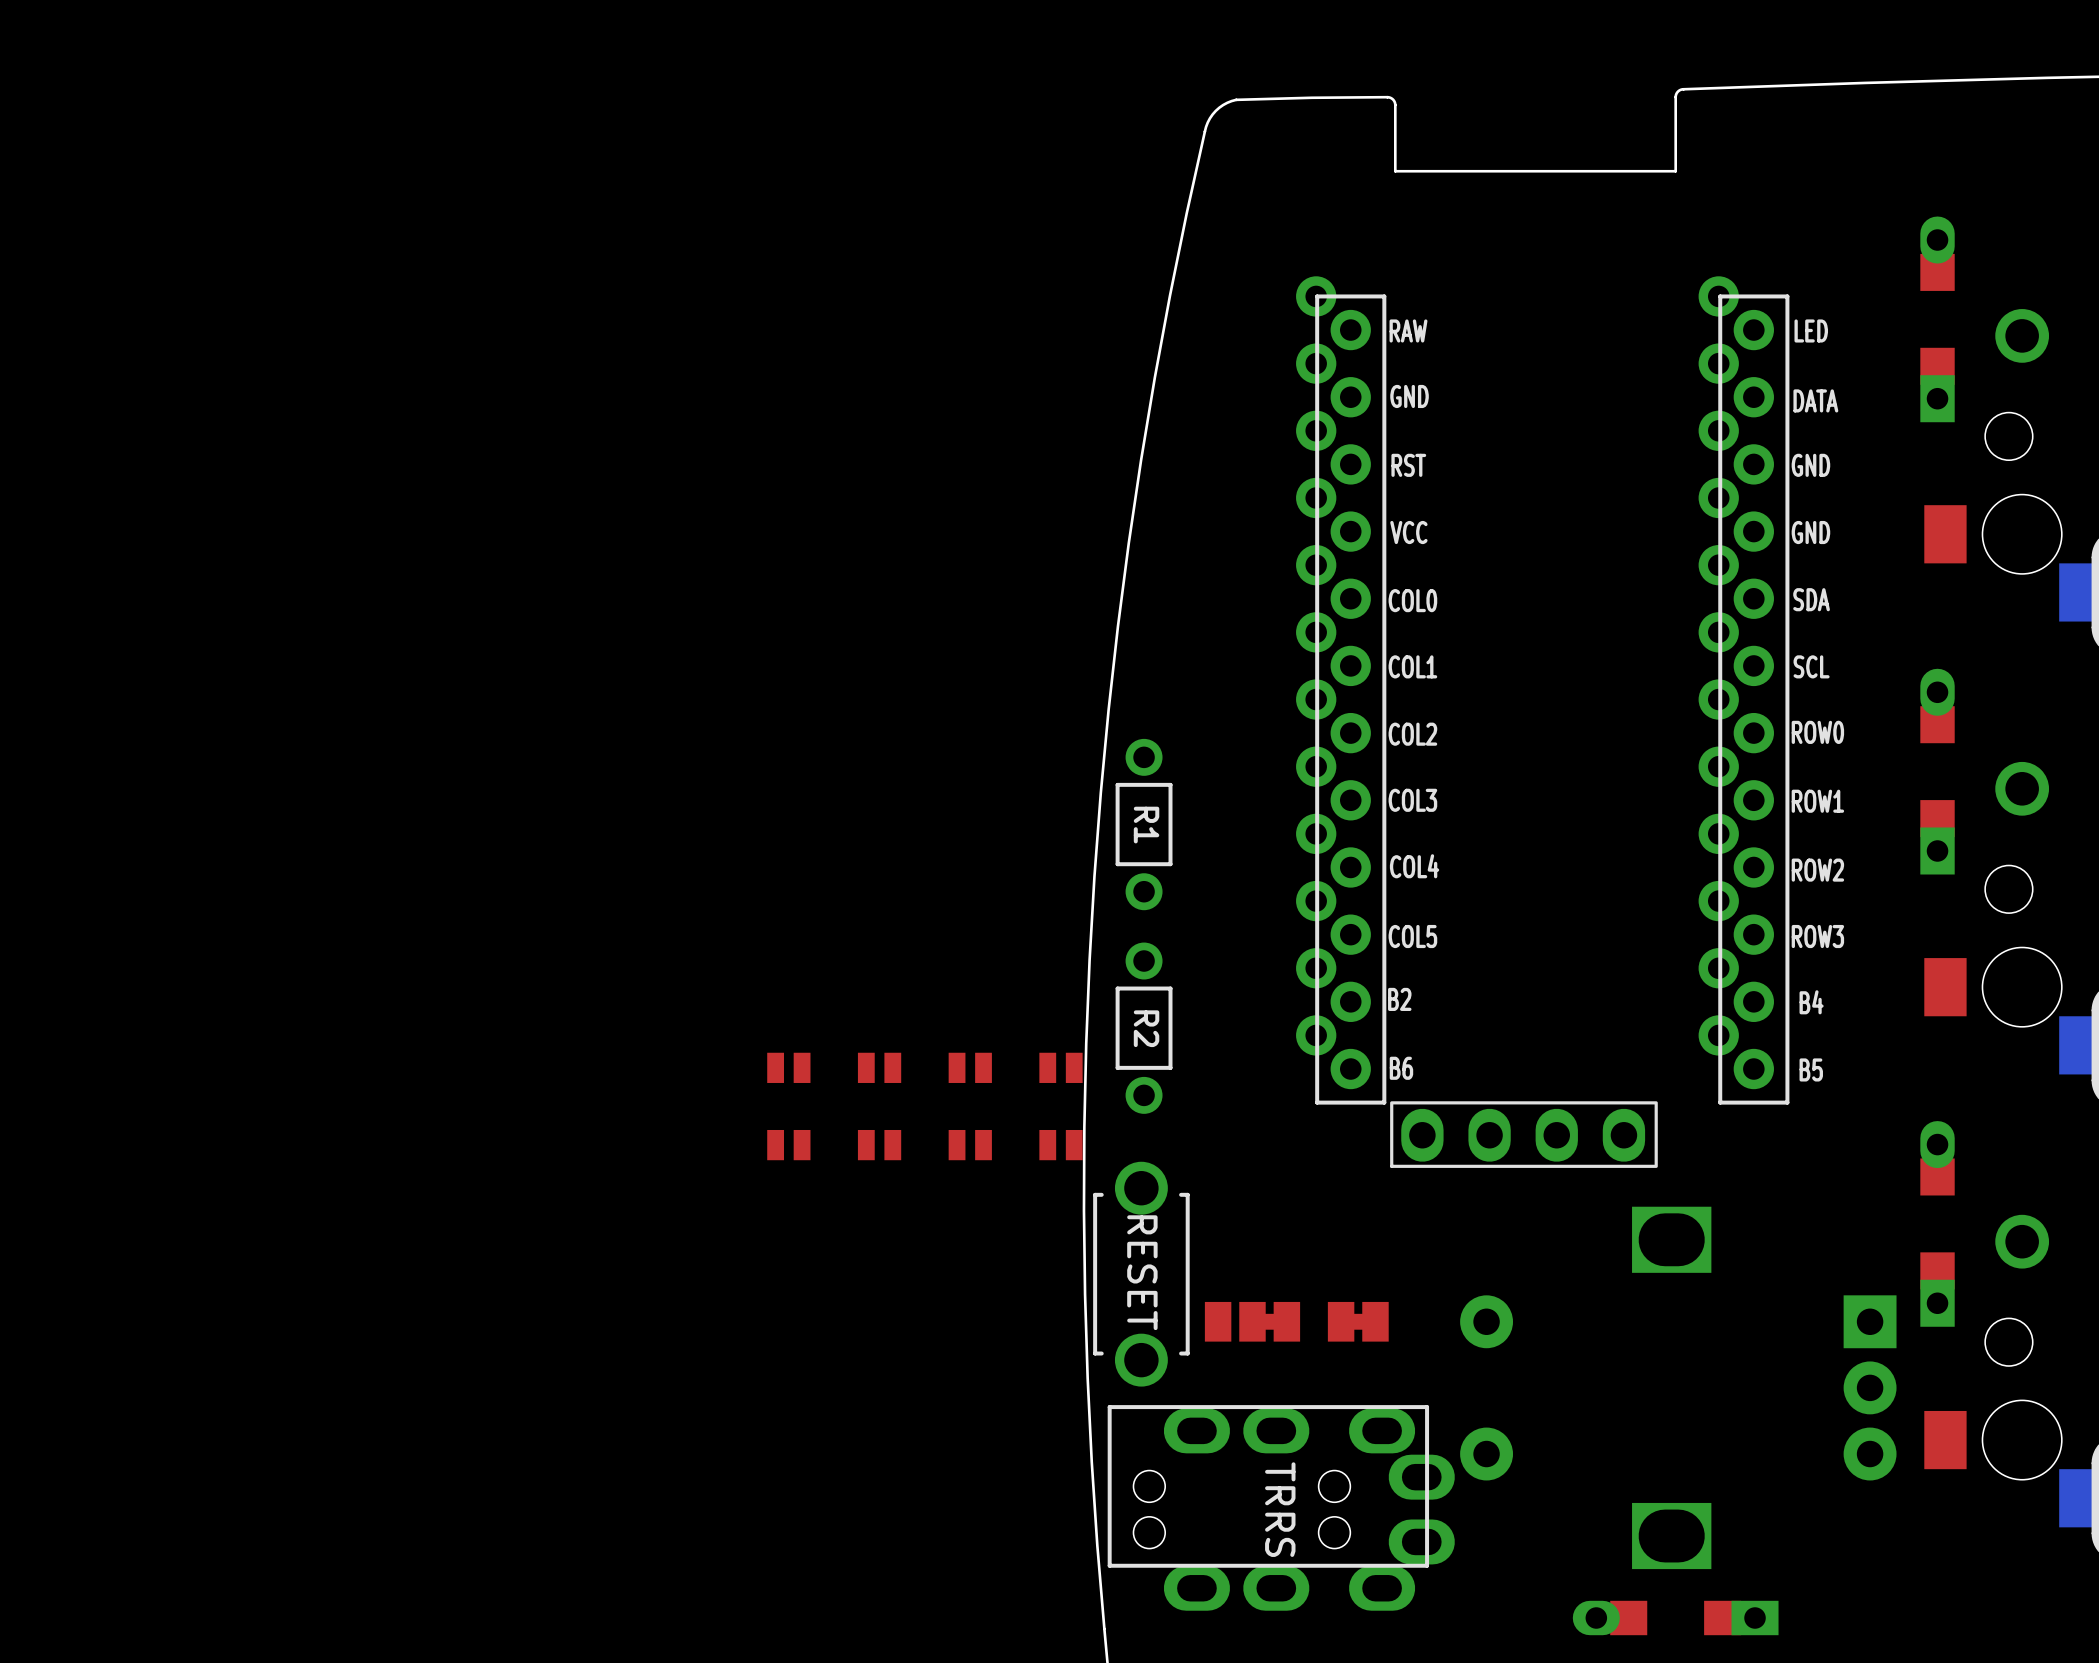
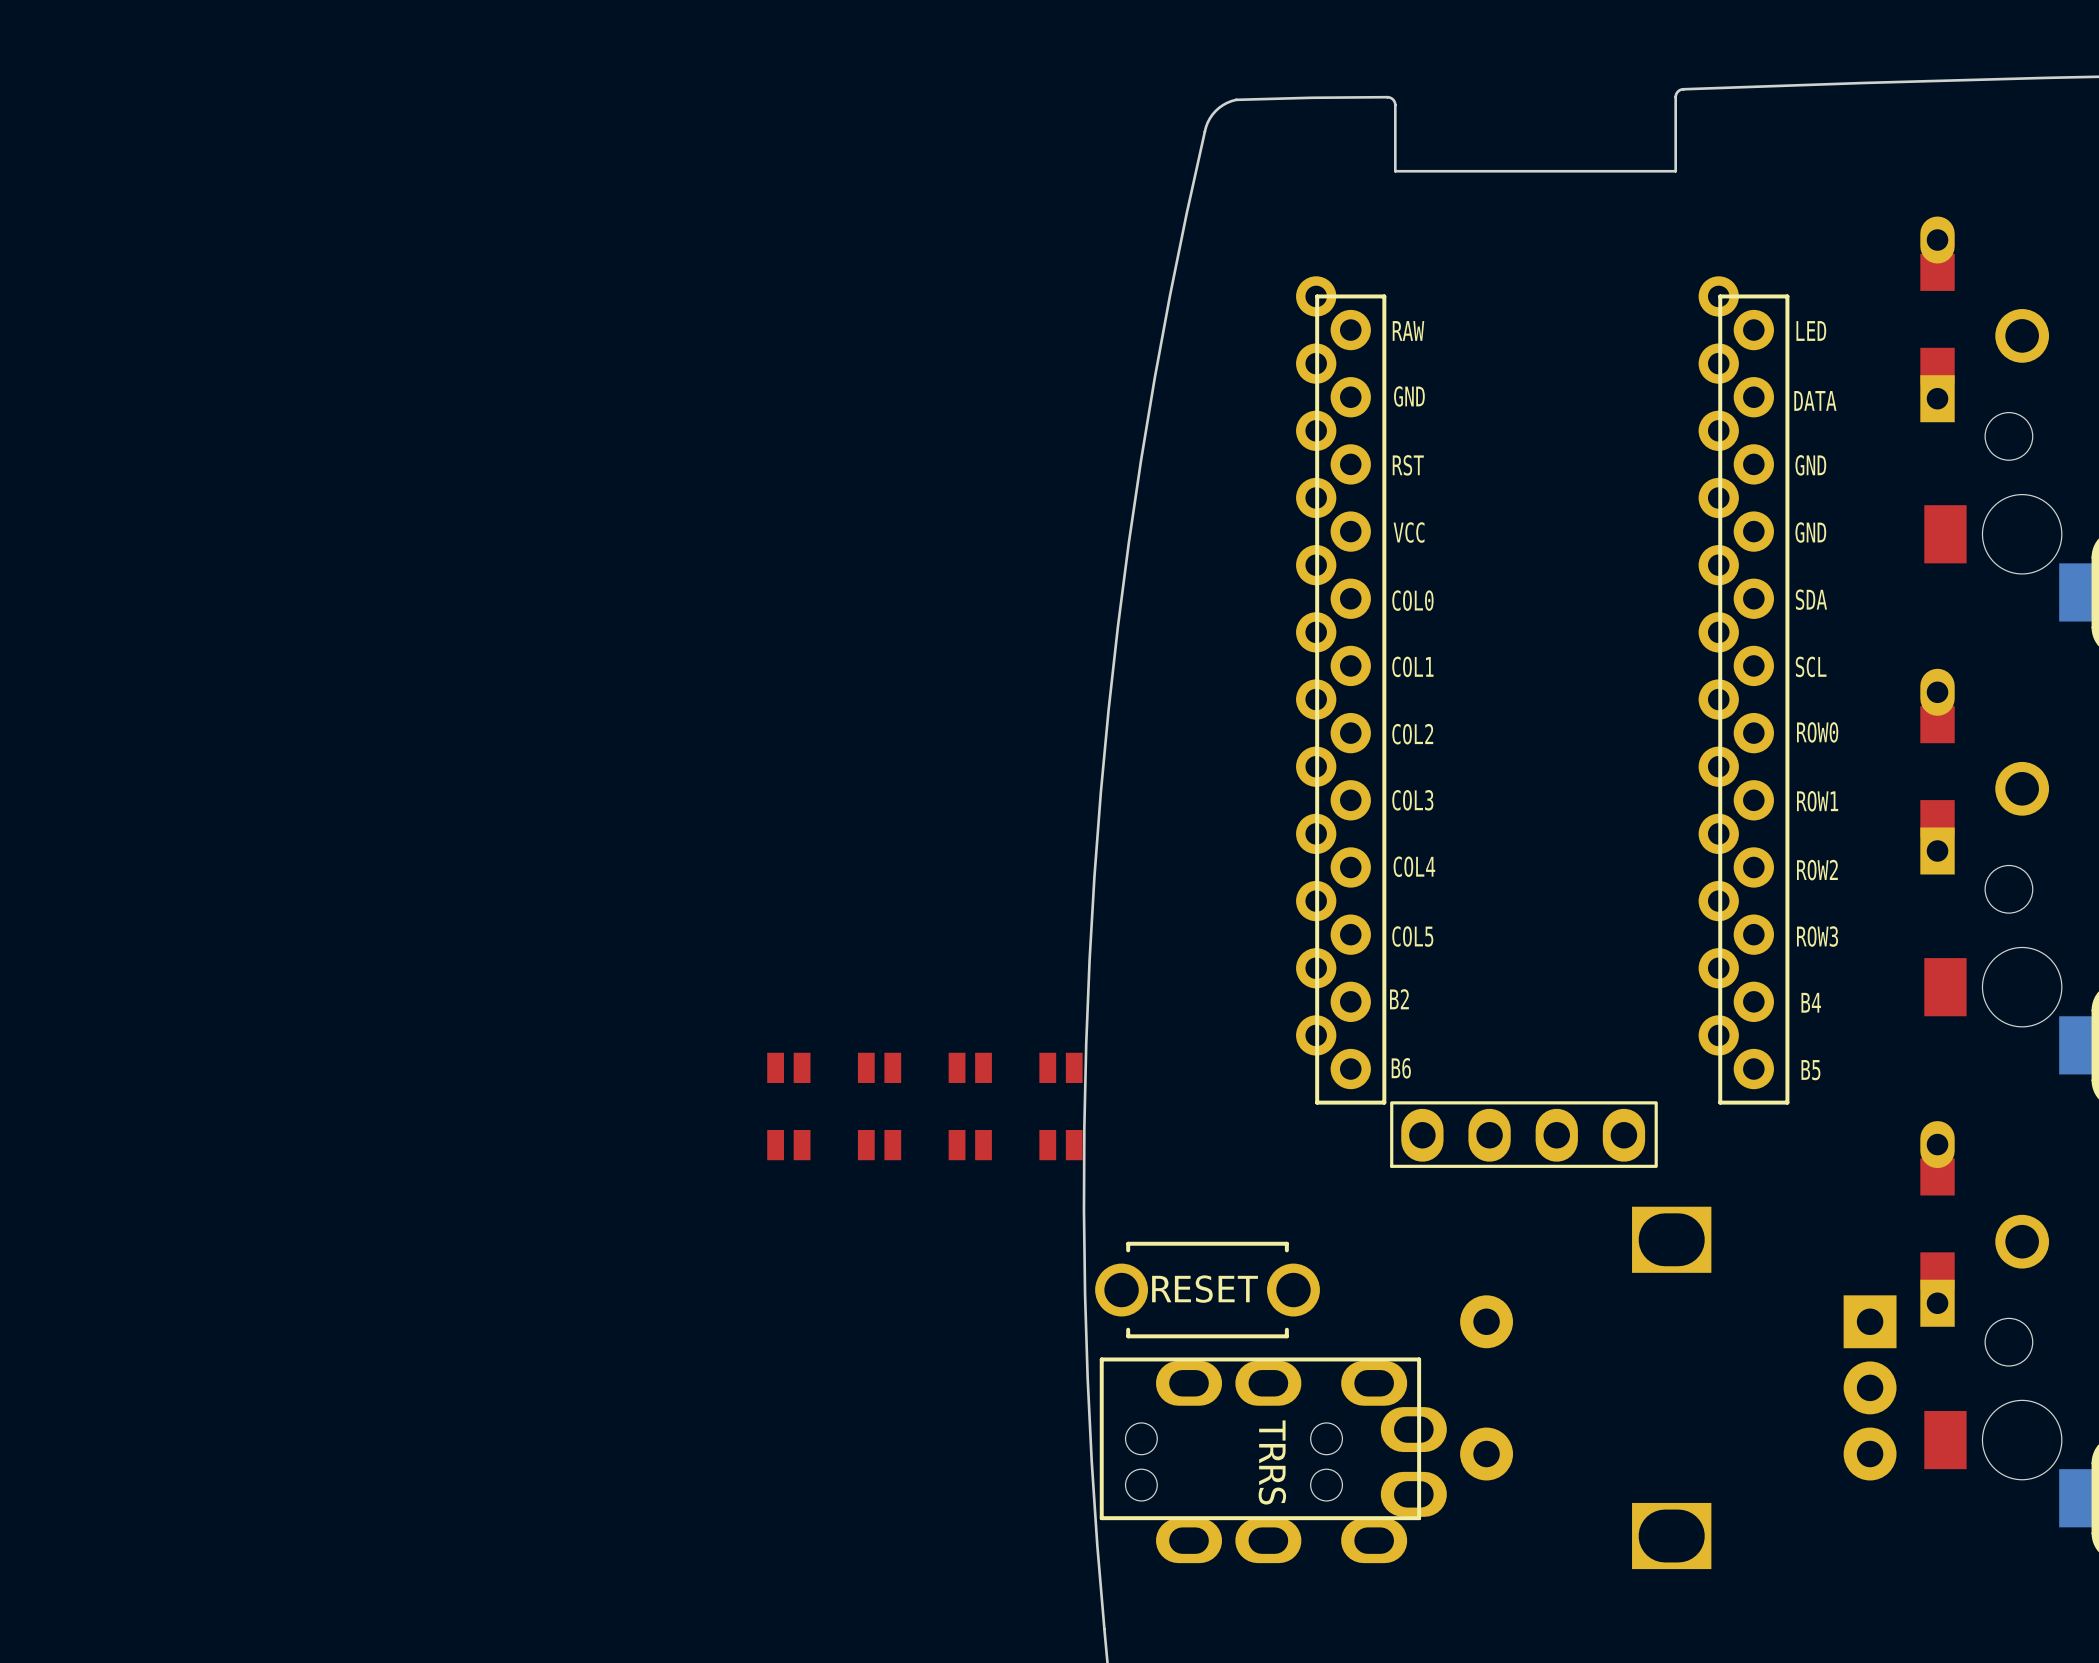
part: (1144, 824) -> none
part: (1144, 1028) -> none
part rotation: 0° (1141, 1274) -> 90° counterclockwise (1207, 1290)
part: (1252, 1321) -> none
part: (1358, 1321) -> none
part position: (1281, 1507) -> (1273, 1460)
part: (1675, 1618) -> none

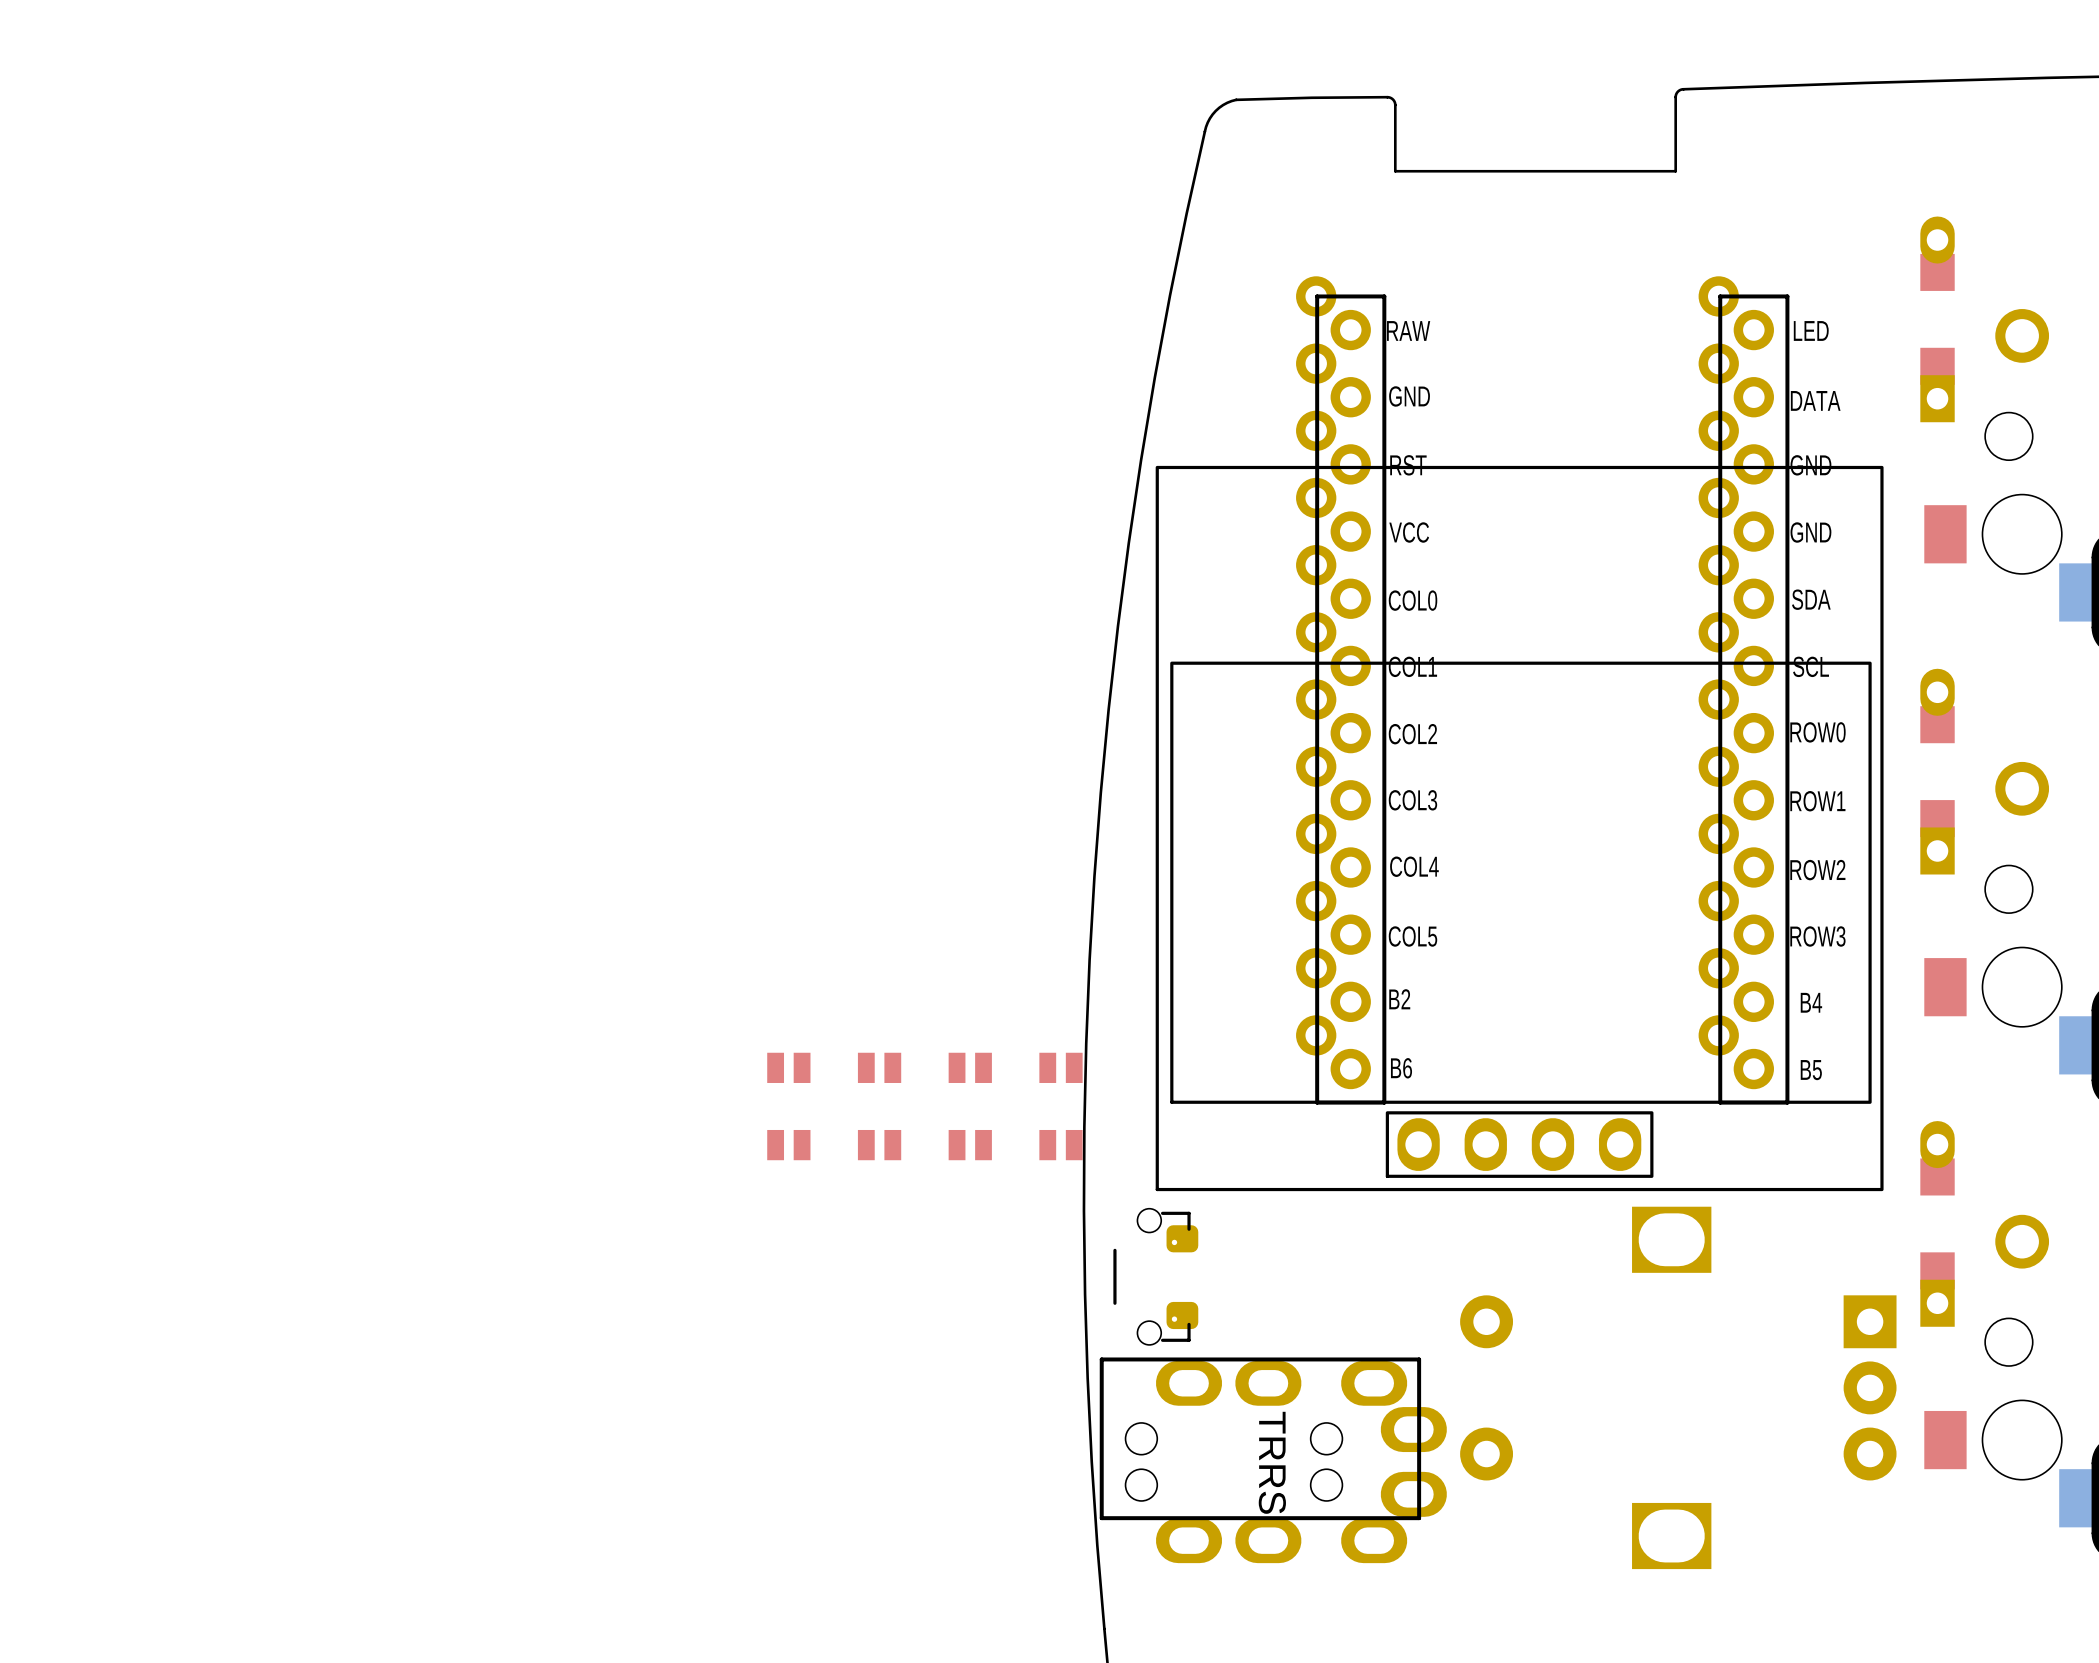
part: none -> (1519, 828)
part: (1523, 1134) -> none
part: none -> (1155, 1276)
part: (1207, 1290) -> none

